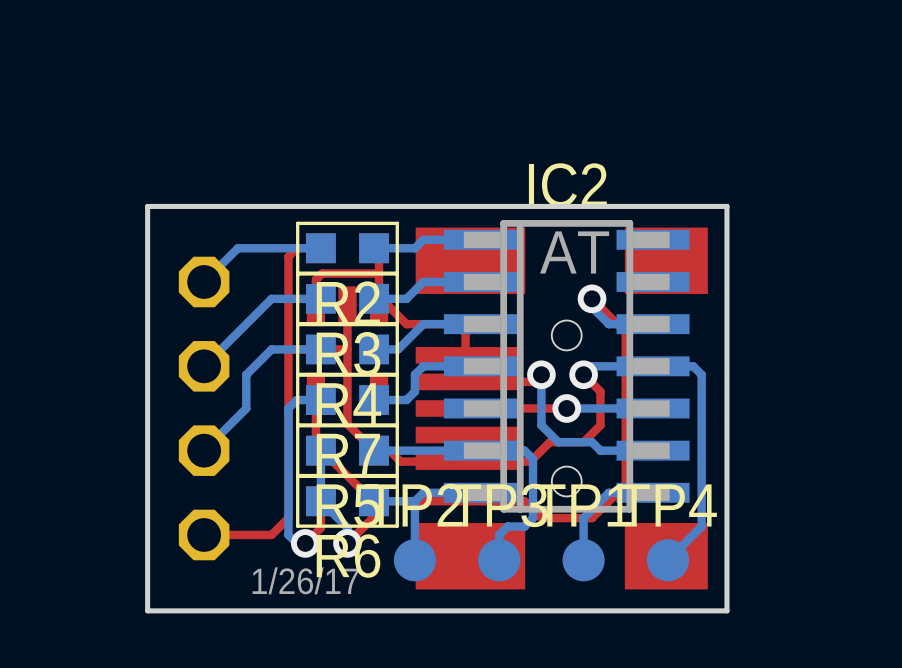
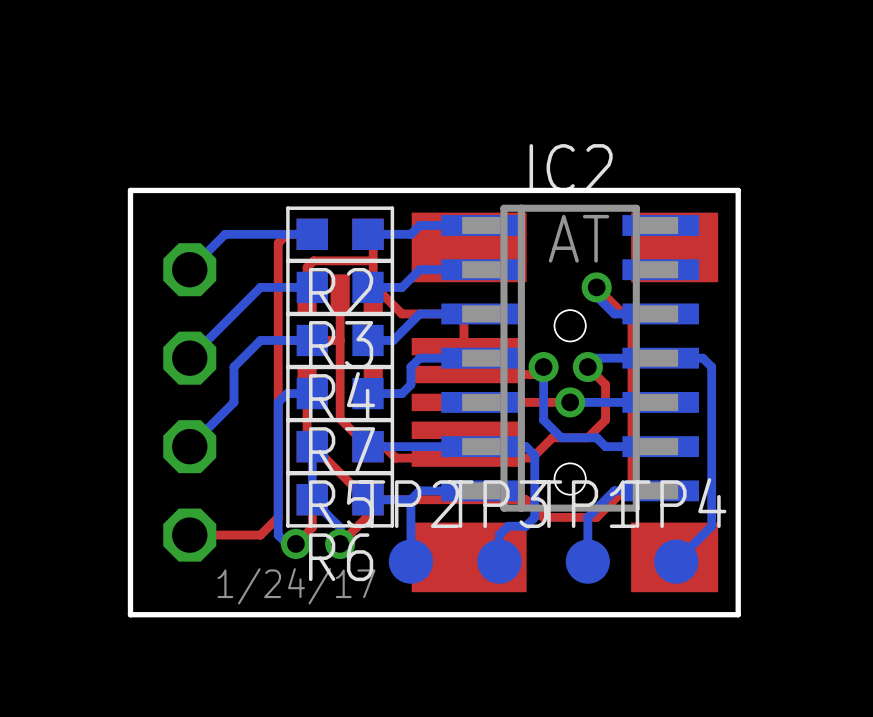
text: 1/26/17 (305, 580) -> 1/24/17 (296, 586)

